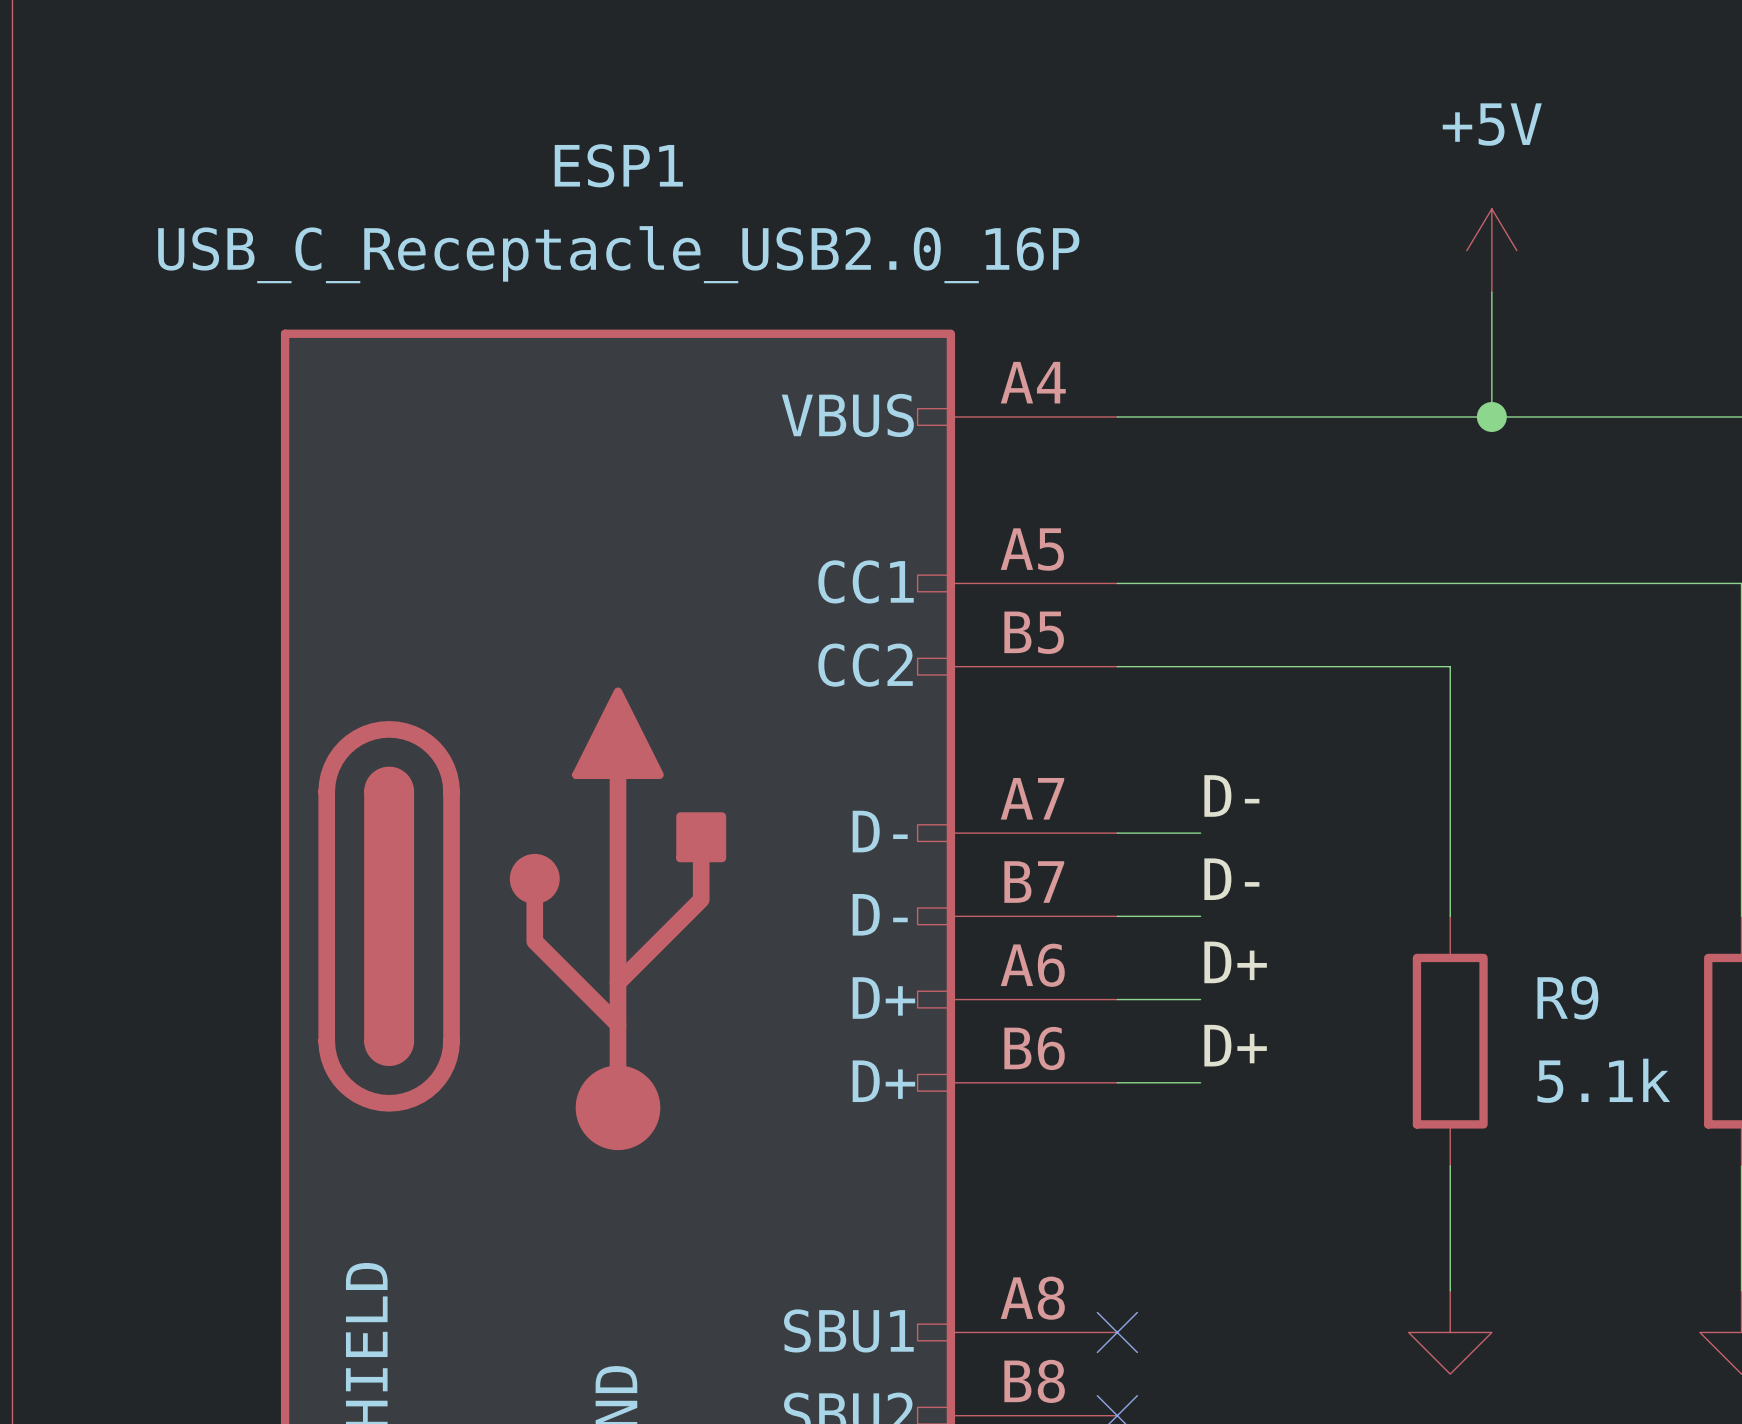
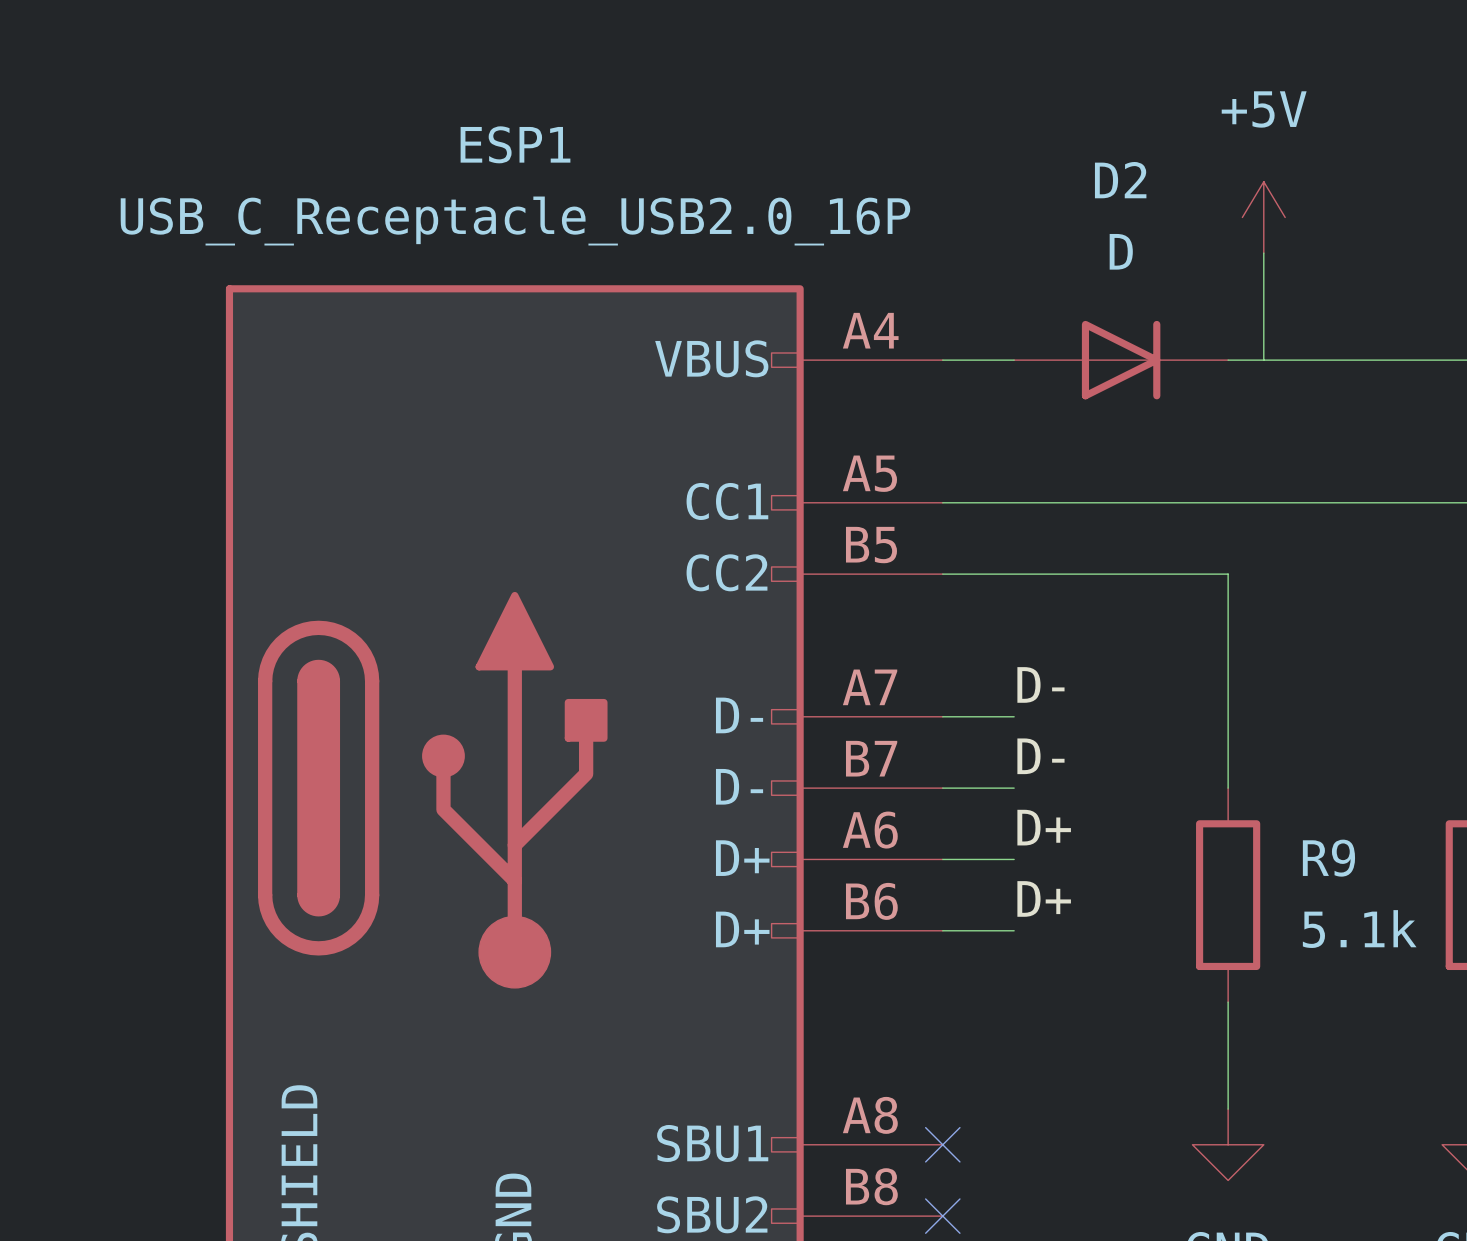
D2: none -> D (1121, 360)
junction: (1491, 416) -> none

